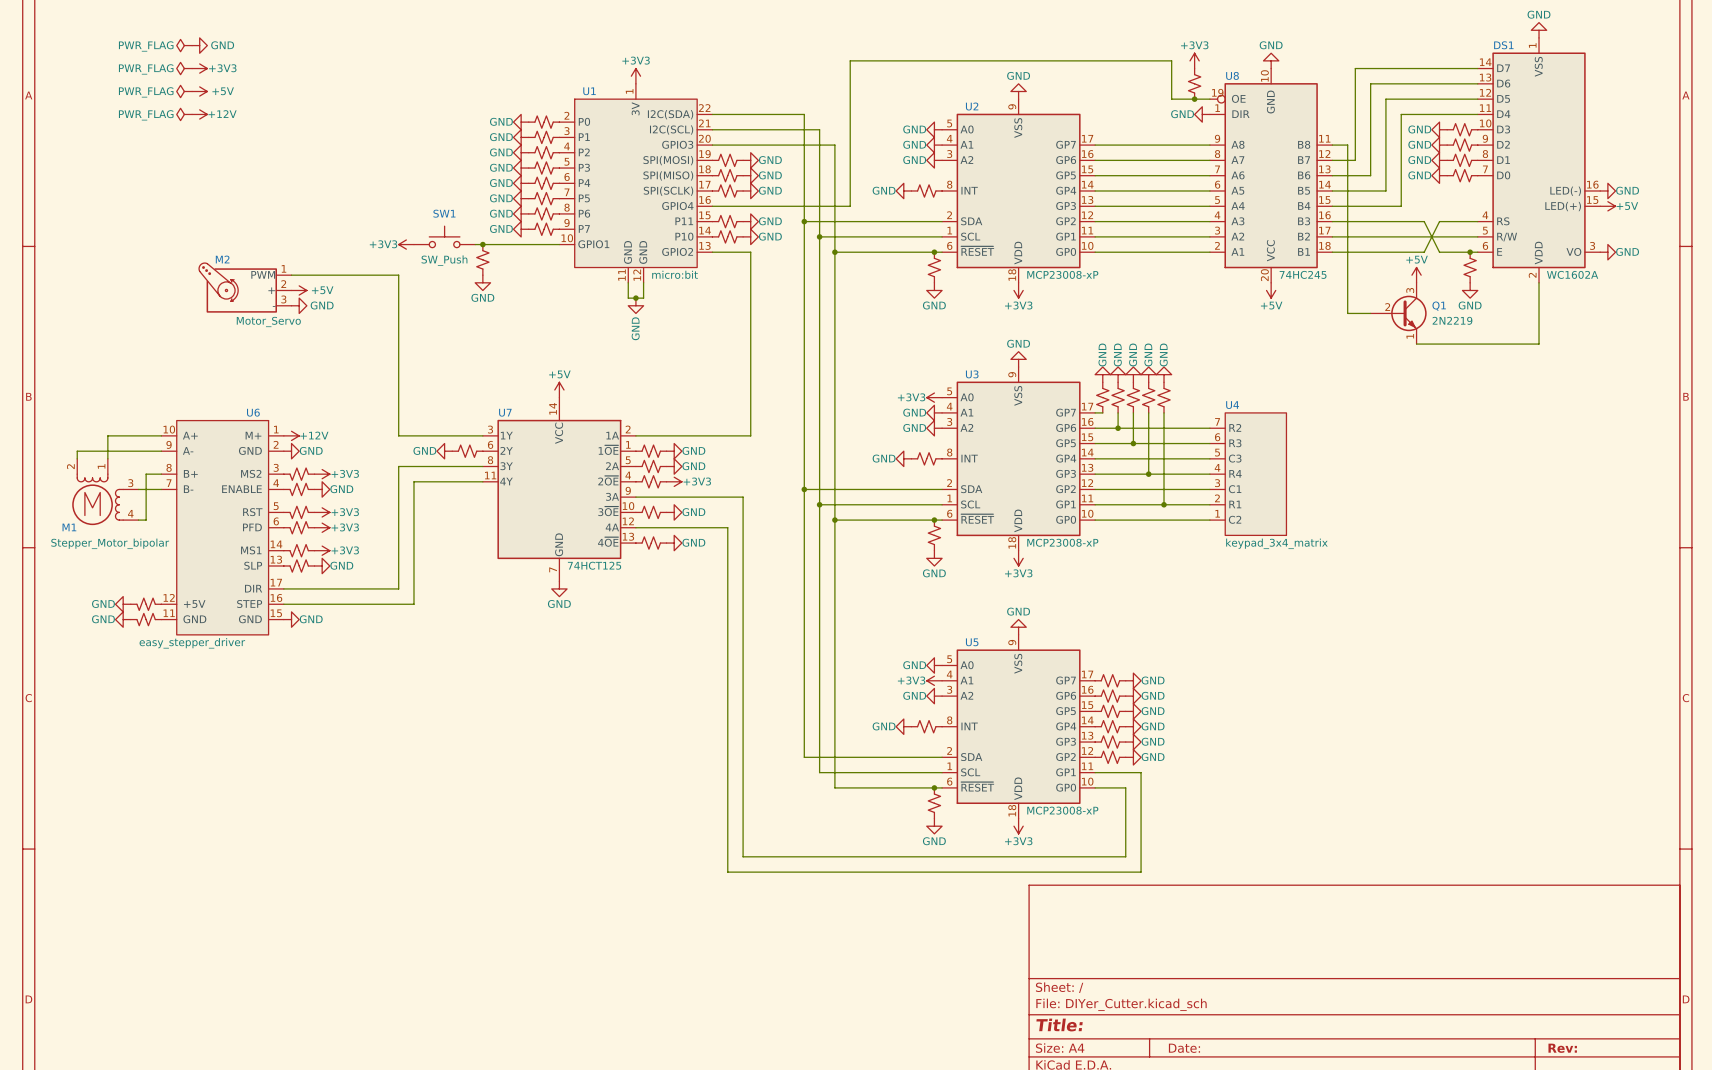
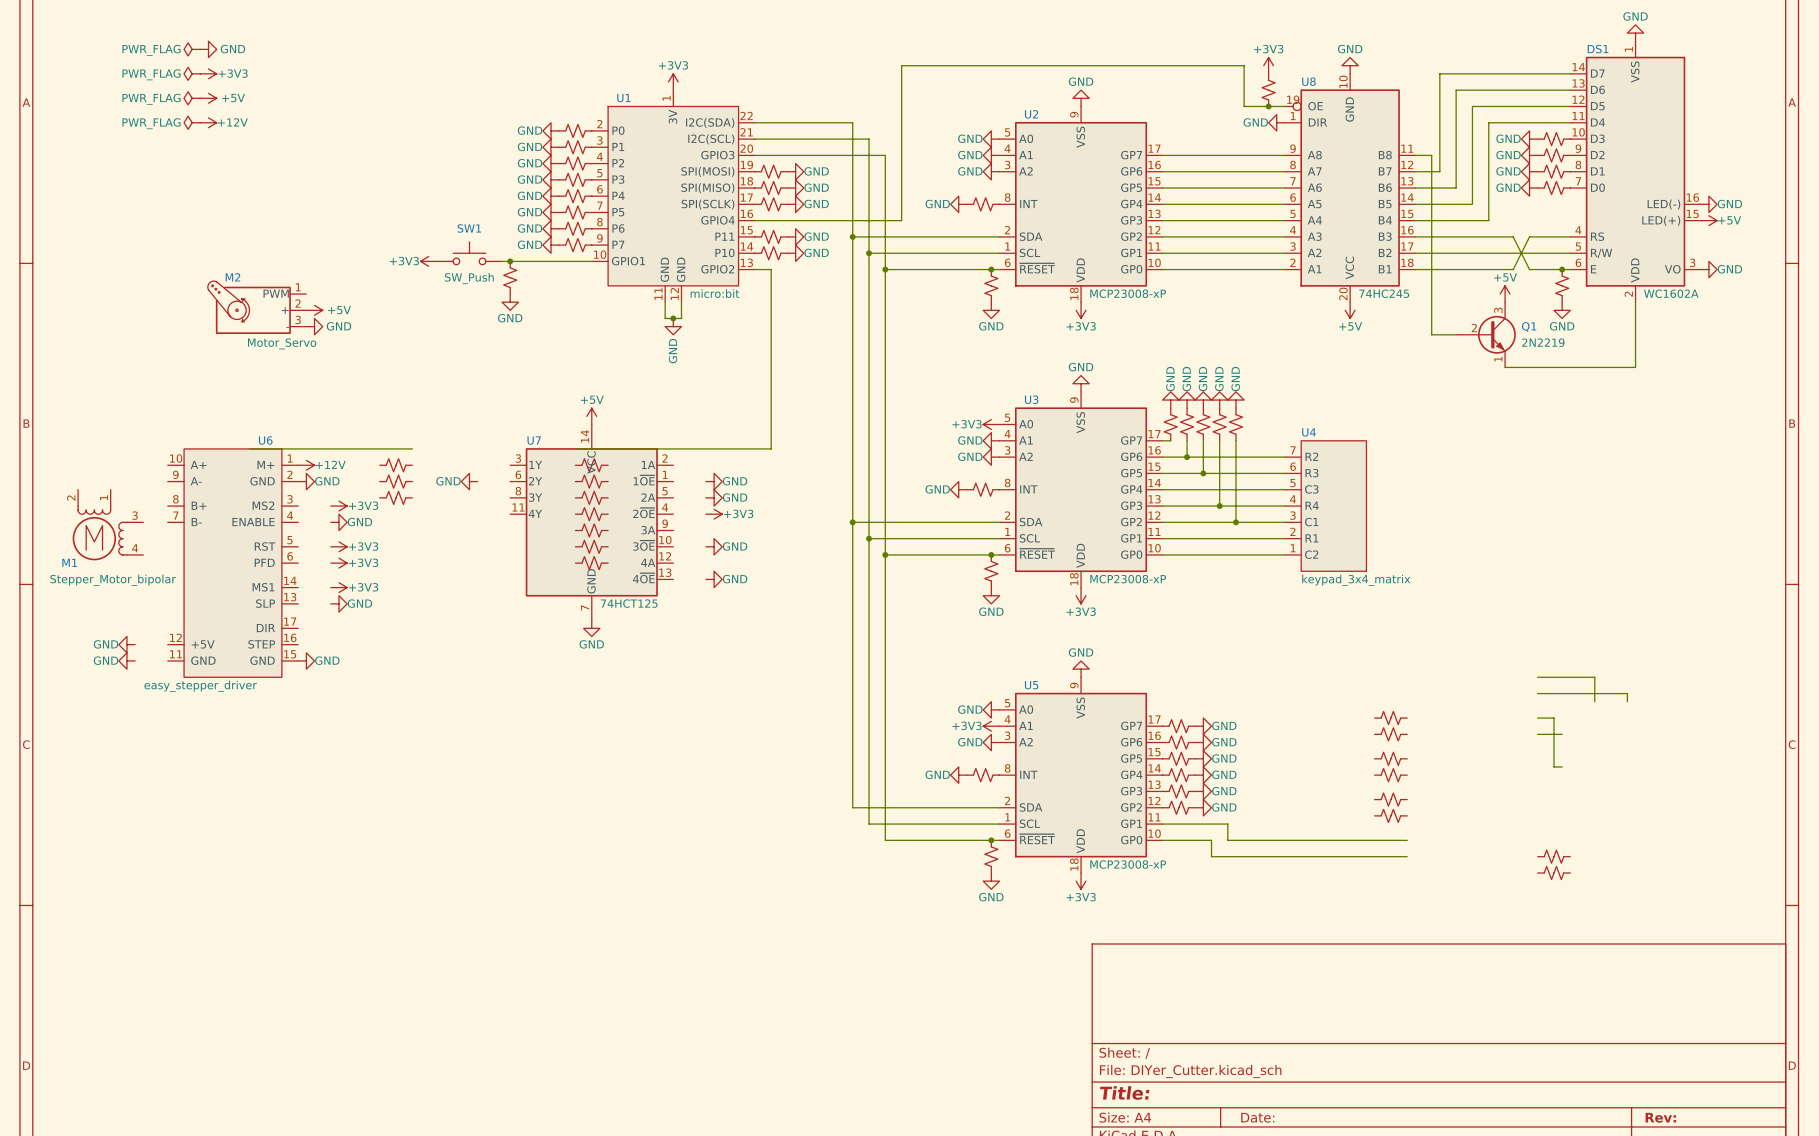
wire: (727, 252) (750, 252) (750, 435) (635, 435) -> (771, 269) (771, 448) (575, 448)
wire: (291, 275) (398, 275) (398, 435) (482, 435) -> none
wire: none -> (249, 448) (412, 448)
wire: (161, 435) (107, 435) (107, 458) -> none
part: none -> (396, 465)
part: none -> (591, 465)
wire: (161, 451) (77, 451) (77, 458) -> none
part: none -> (396, 481)
part: (467, 451) -> none
part: none -> (591, 481)
part: (651, 451) -> none
part: none -> (396, 497)
wire: (482, 466) (398, 466) (398, 588) (283, 588) -> none
part: none -> (591, 497)
part: (651, 466) -> none
wire: (161, 474) (146, 474) (146, 520) (138, 520) -> none
part: (299, 474) -> none
wire: (482, 481) (413, 481) (413, 604) (283, 604) -> none
part: none -> (591, 514)
part: (651, 481) -> none
wire: (138, 489) (161, 489) -> none
part: (299, 489) -> none
wire: (1164, 489) (1164, 504) -> none
part: none -> (591, 530)
wire: (635, 497) (743, 497) (743, 856) (1125, 856) (1125, 787) -> none
junction position: (1164, 504) -> (1235, 522)
part: (299, 512) -> none
part: none -> (591, 546)
part: (651, 512) -> none
part: (299, 527) -> none
part: none -> (591, 563)
wire: (635, 527) (727, 527) (727, 872) (1141, 872) (1141, 803) -> (1407, 856) (1211, 856)
part: (651, 543) -> none
part: (299, 550) -> none
part: (299, 565) -> none
part: (146, 604) -> none
part: (146, 619) -> none
wire: none -> (1537, 677) (1594, 677) (1594, 701)
wire: none -> (1537, 693) (1627, 693) (1627, 701)
part: none -> (1390, 718)
wire: none -> (1537, 718) (1554, 718) (1554, 766) (1562, 766)
part: none -> (1390, 734)
wire: none -> (1537, 734) (1562, 734)
part: none -> (1390, 758)
part: none -> (1390, 775)
part: none -> (1390, 799)
part: none -> (1390, 815)
wire: (1141, 772) (1141, 787) -> (1195, 840) (1211, 840)
wire: none -> (1211, 824) (1227, 824) (1227, 840) (1407, 840)
part: none -> (1554, 856)
part: none -> (1554, 872)

